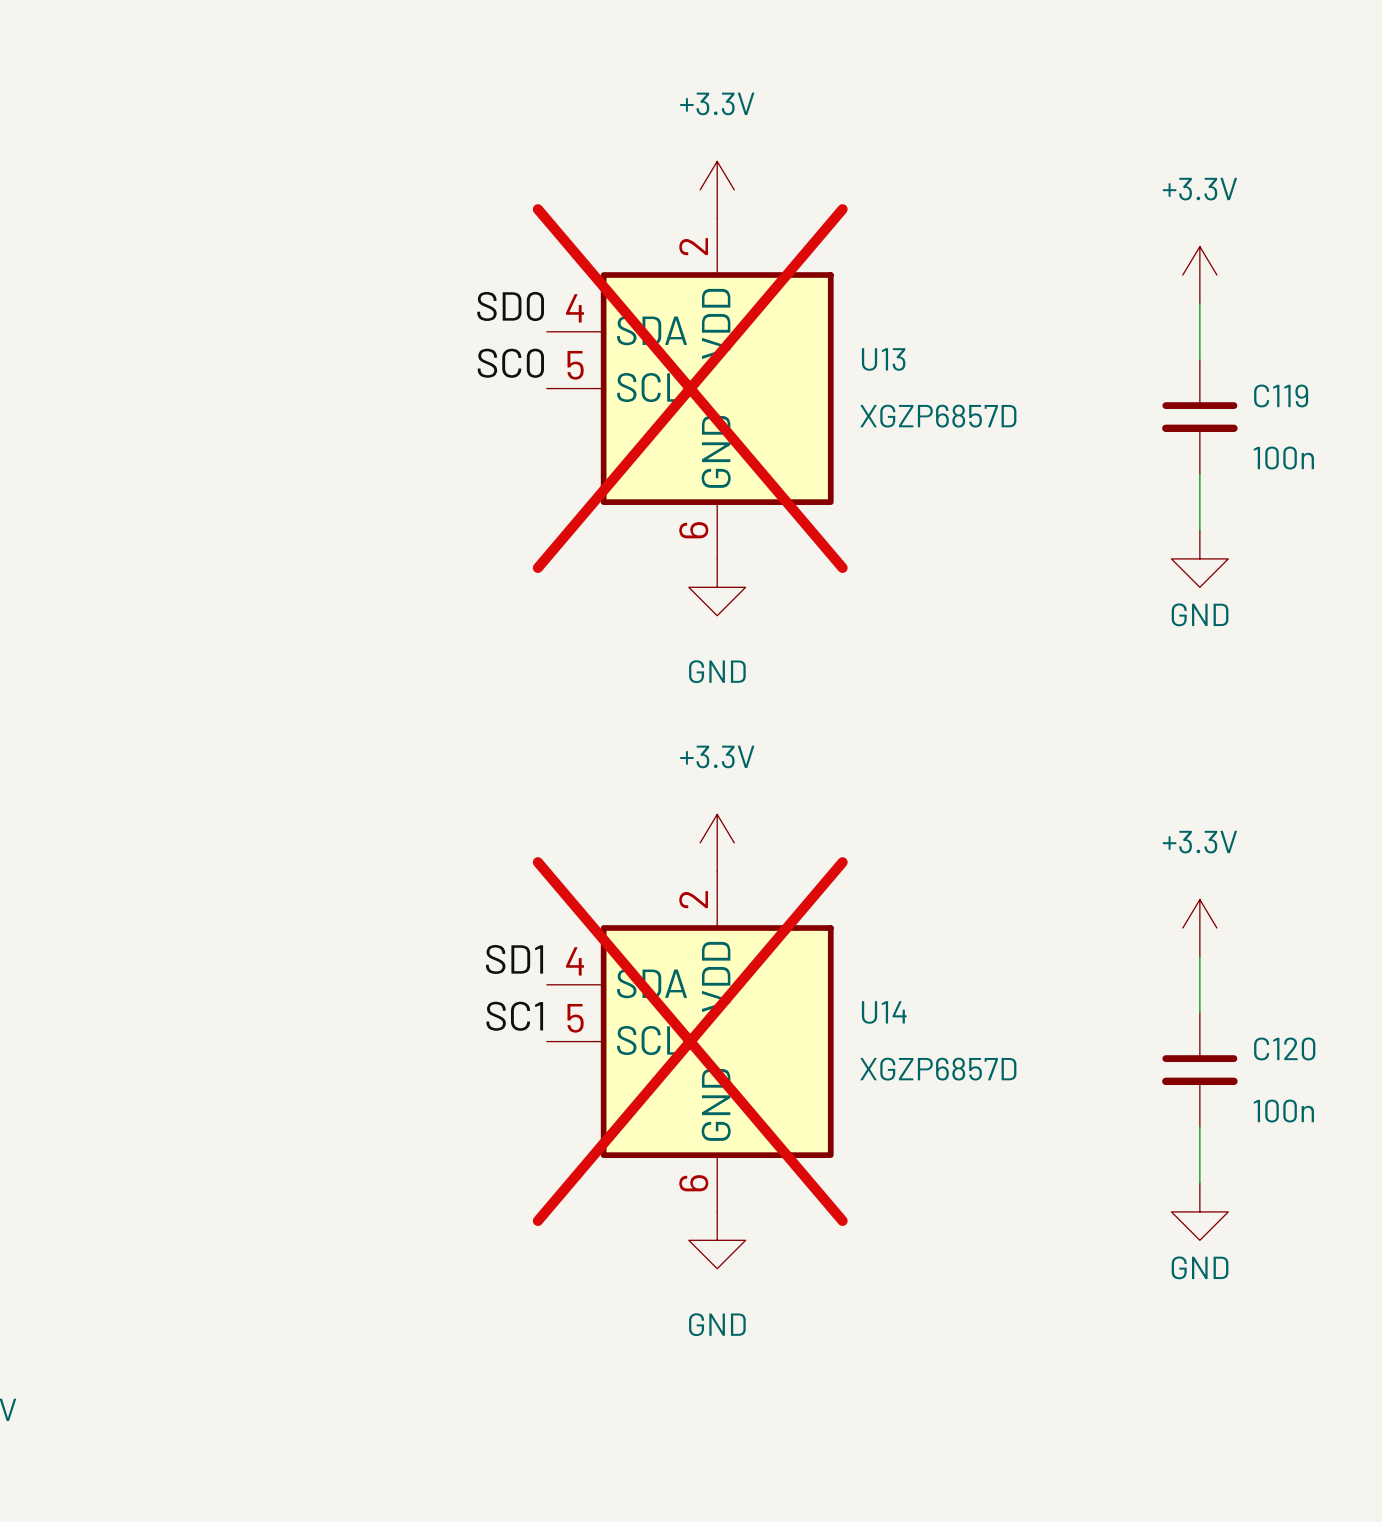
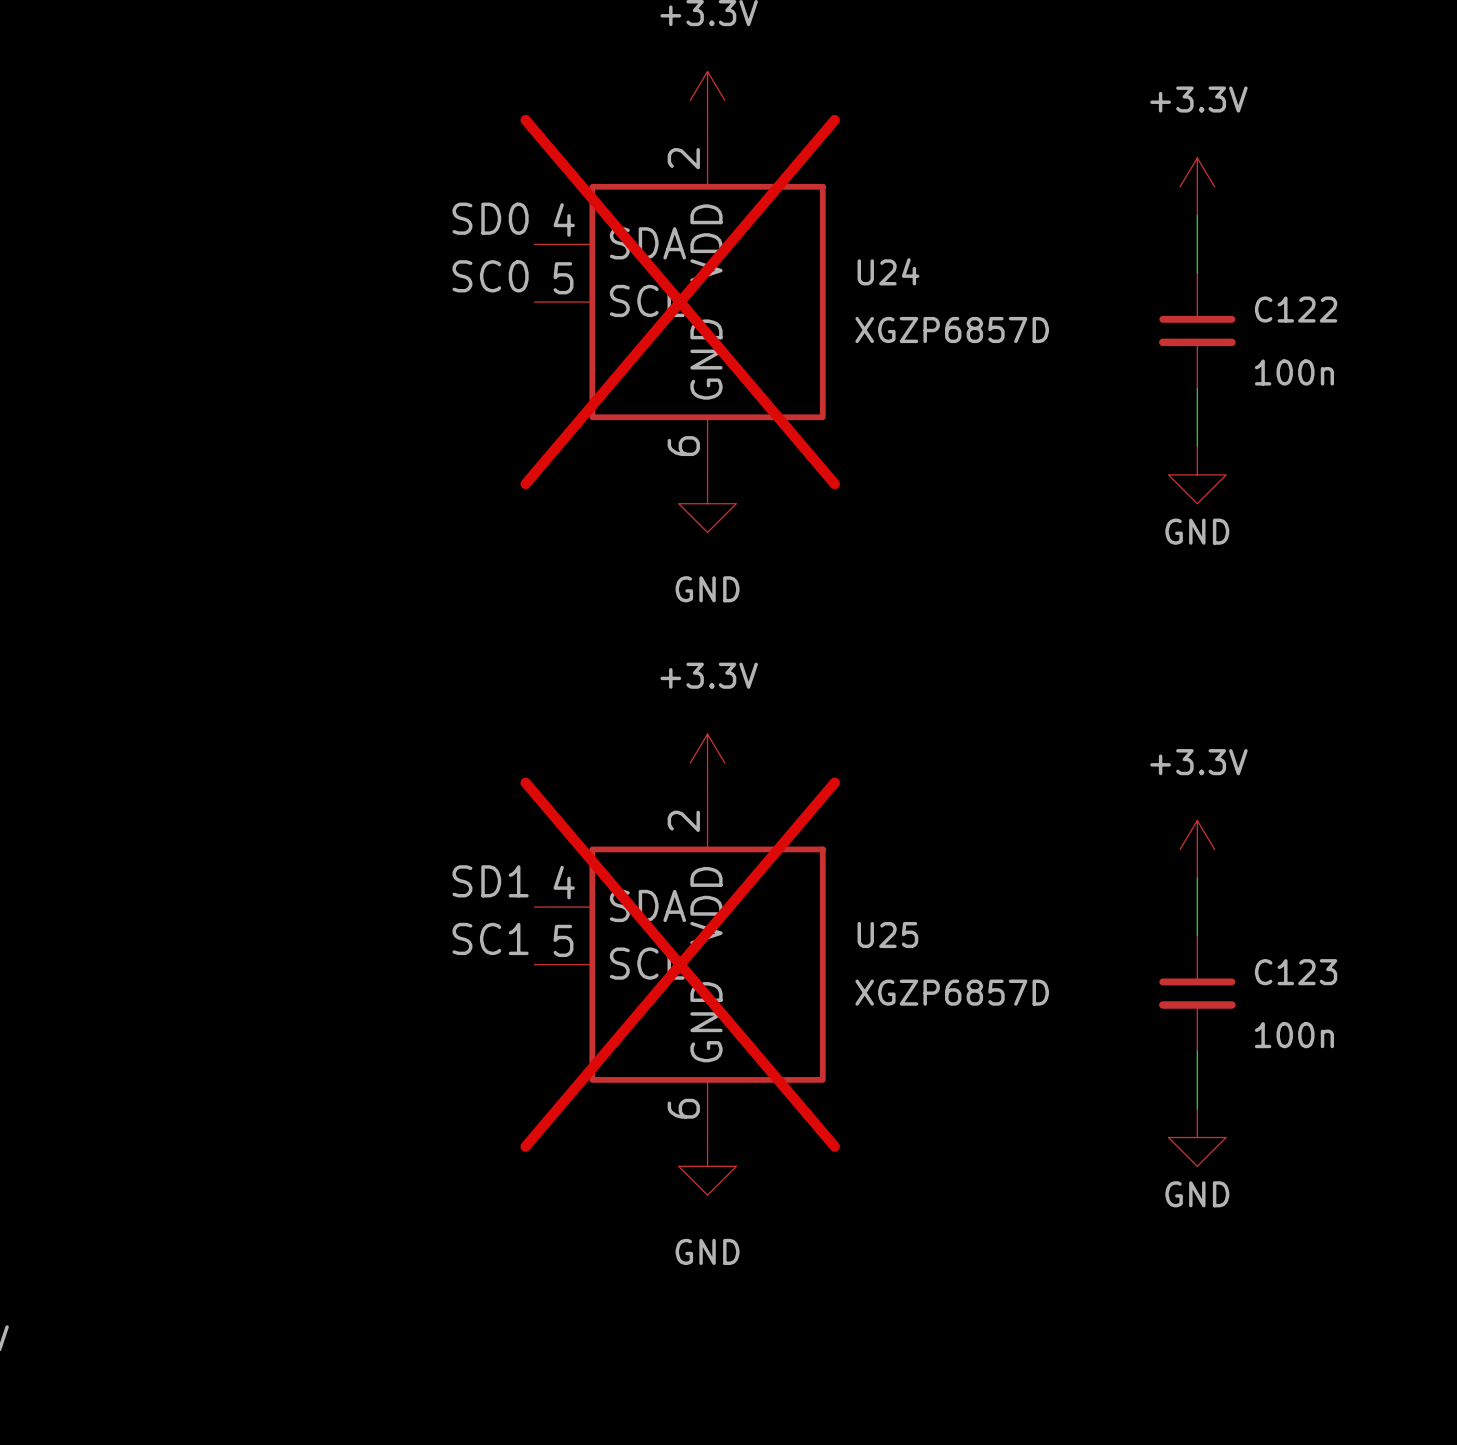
U13 name: U13 (883, 359) -> U24 (888, 271)
C119 name: C119 (1281, 395) -> C122 (1296, 309)
U14 name: U14 (884, 1012) -> U25 (887, 935)
C120 name: C120 (1284, 1048) -> C123 (1296, 972)

